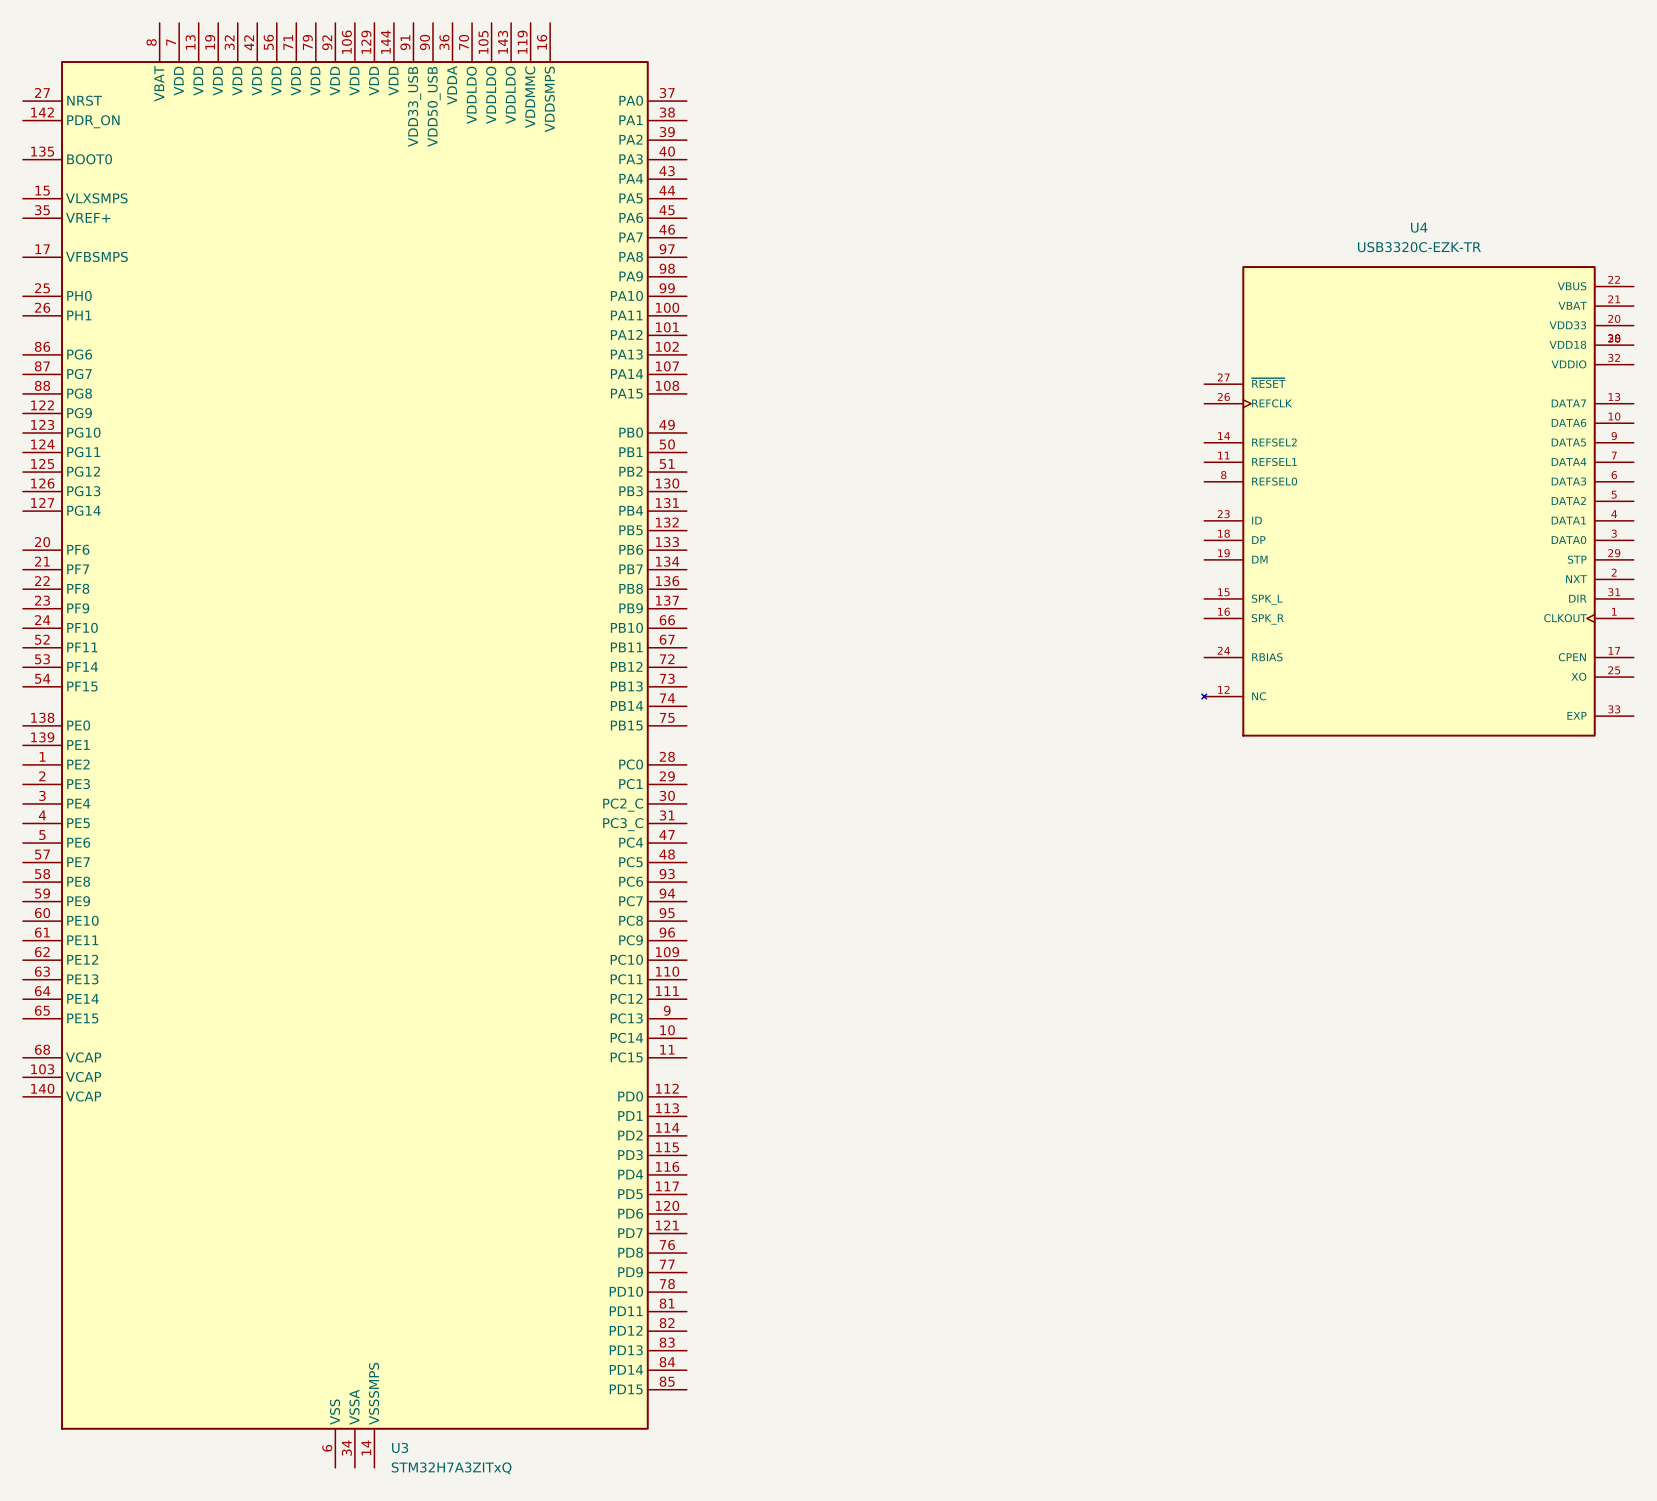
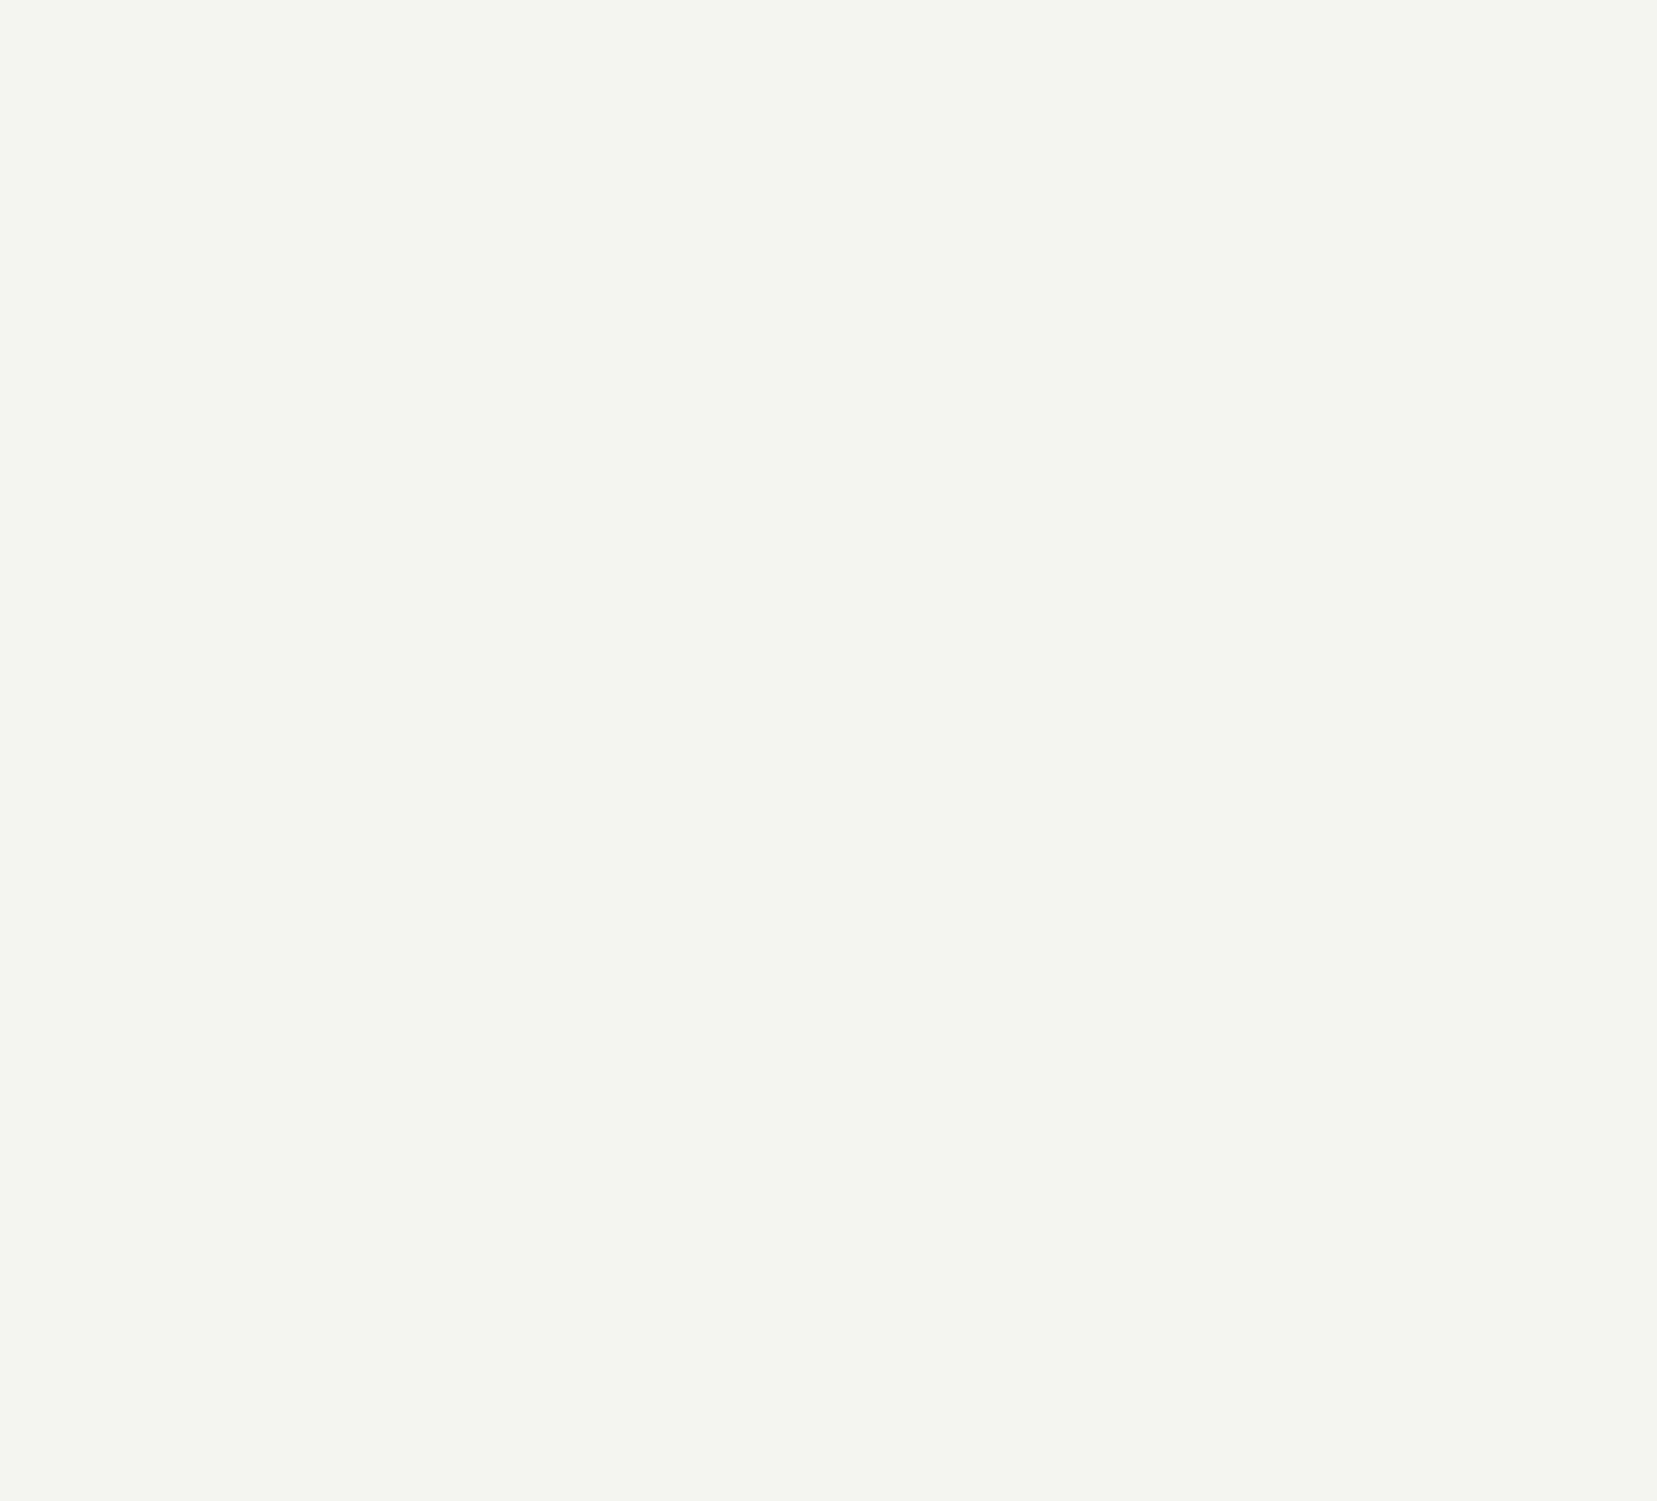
U4: USB3320C-EZK-TR (1417, 501) -> none
U3: STM32H7A3ZITxQ (354, 745) -> none

